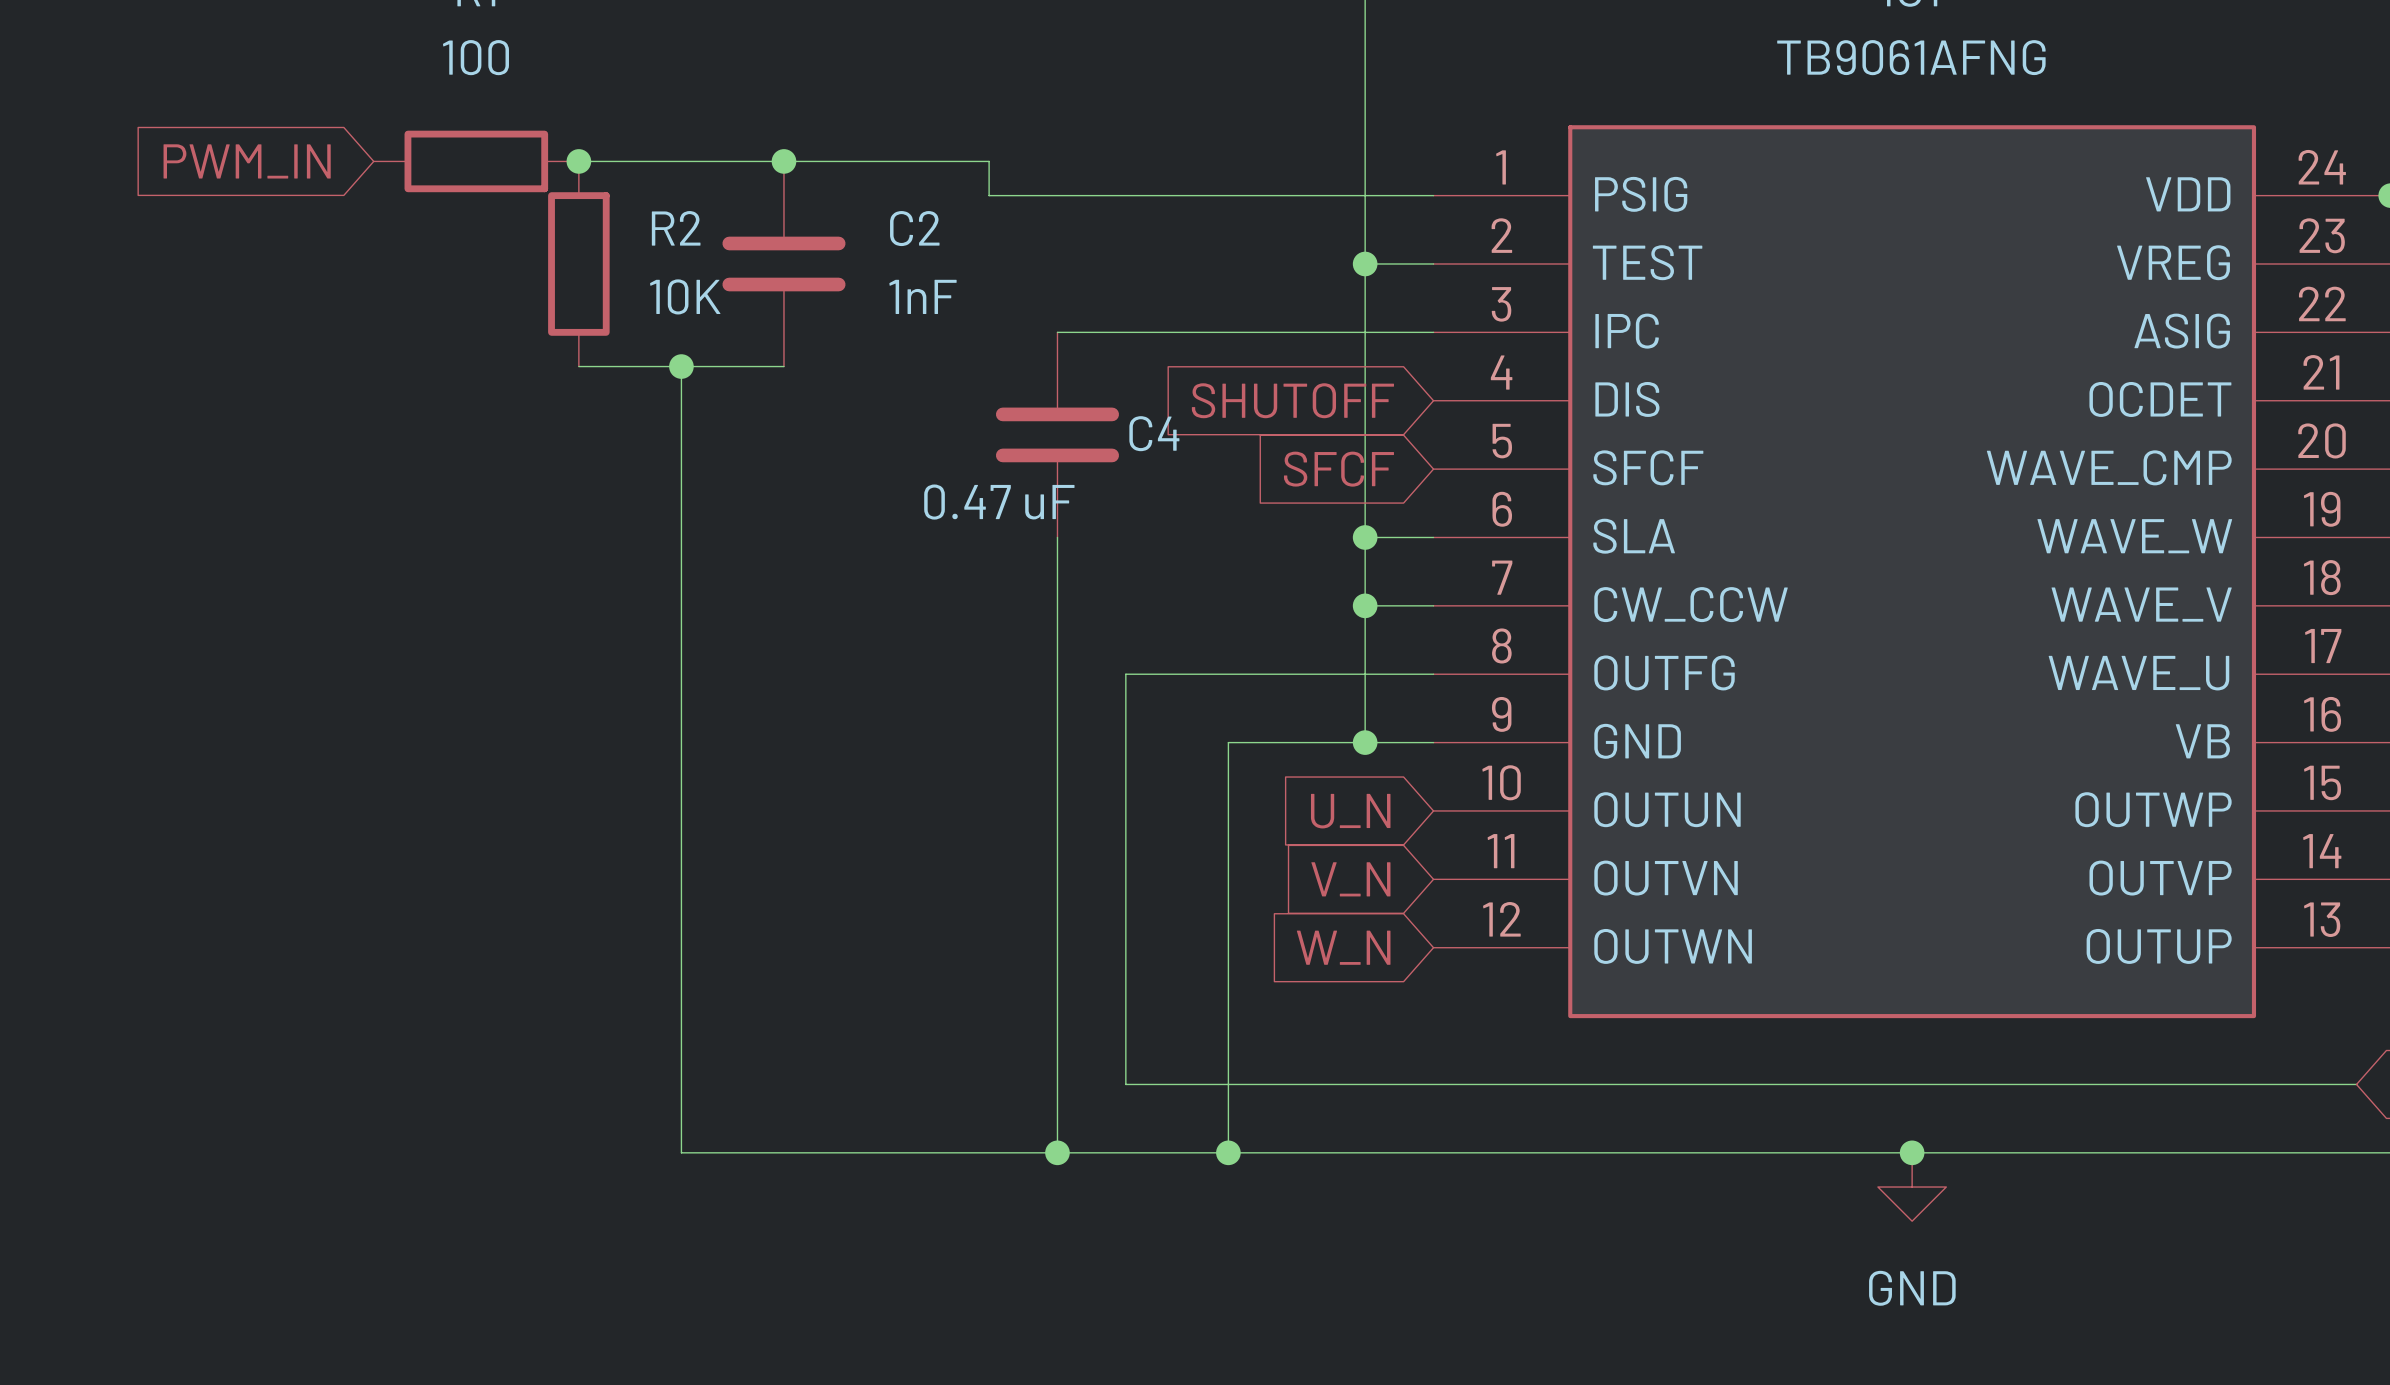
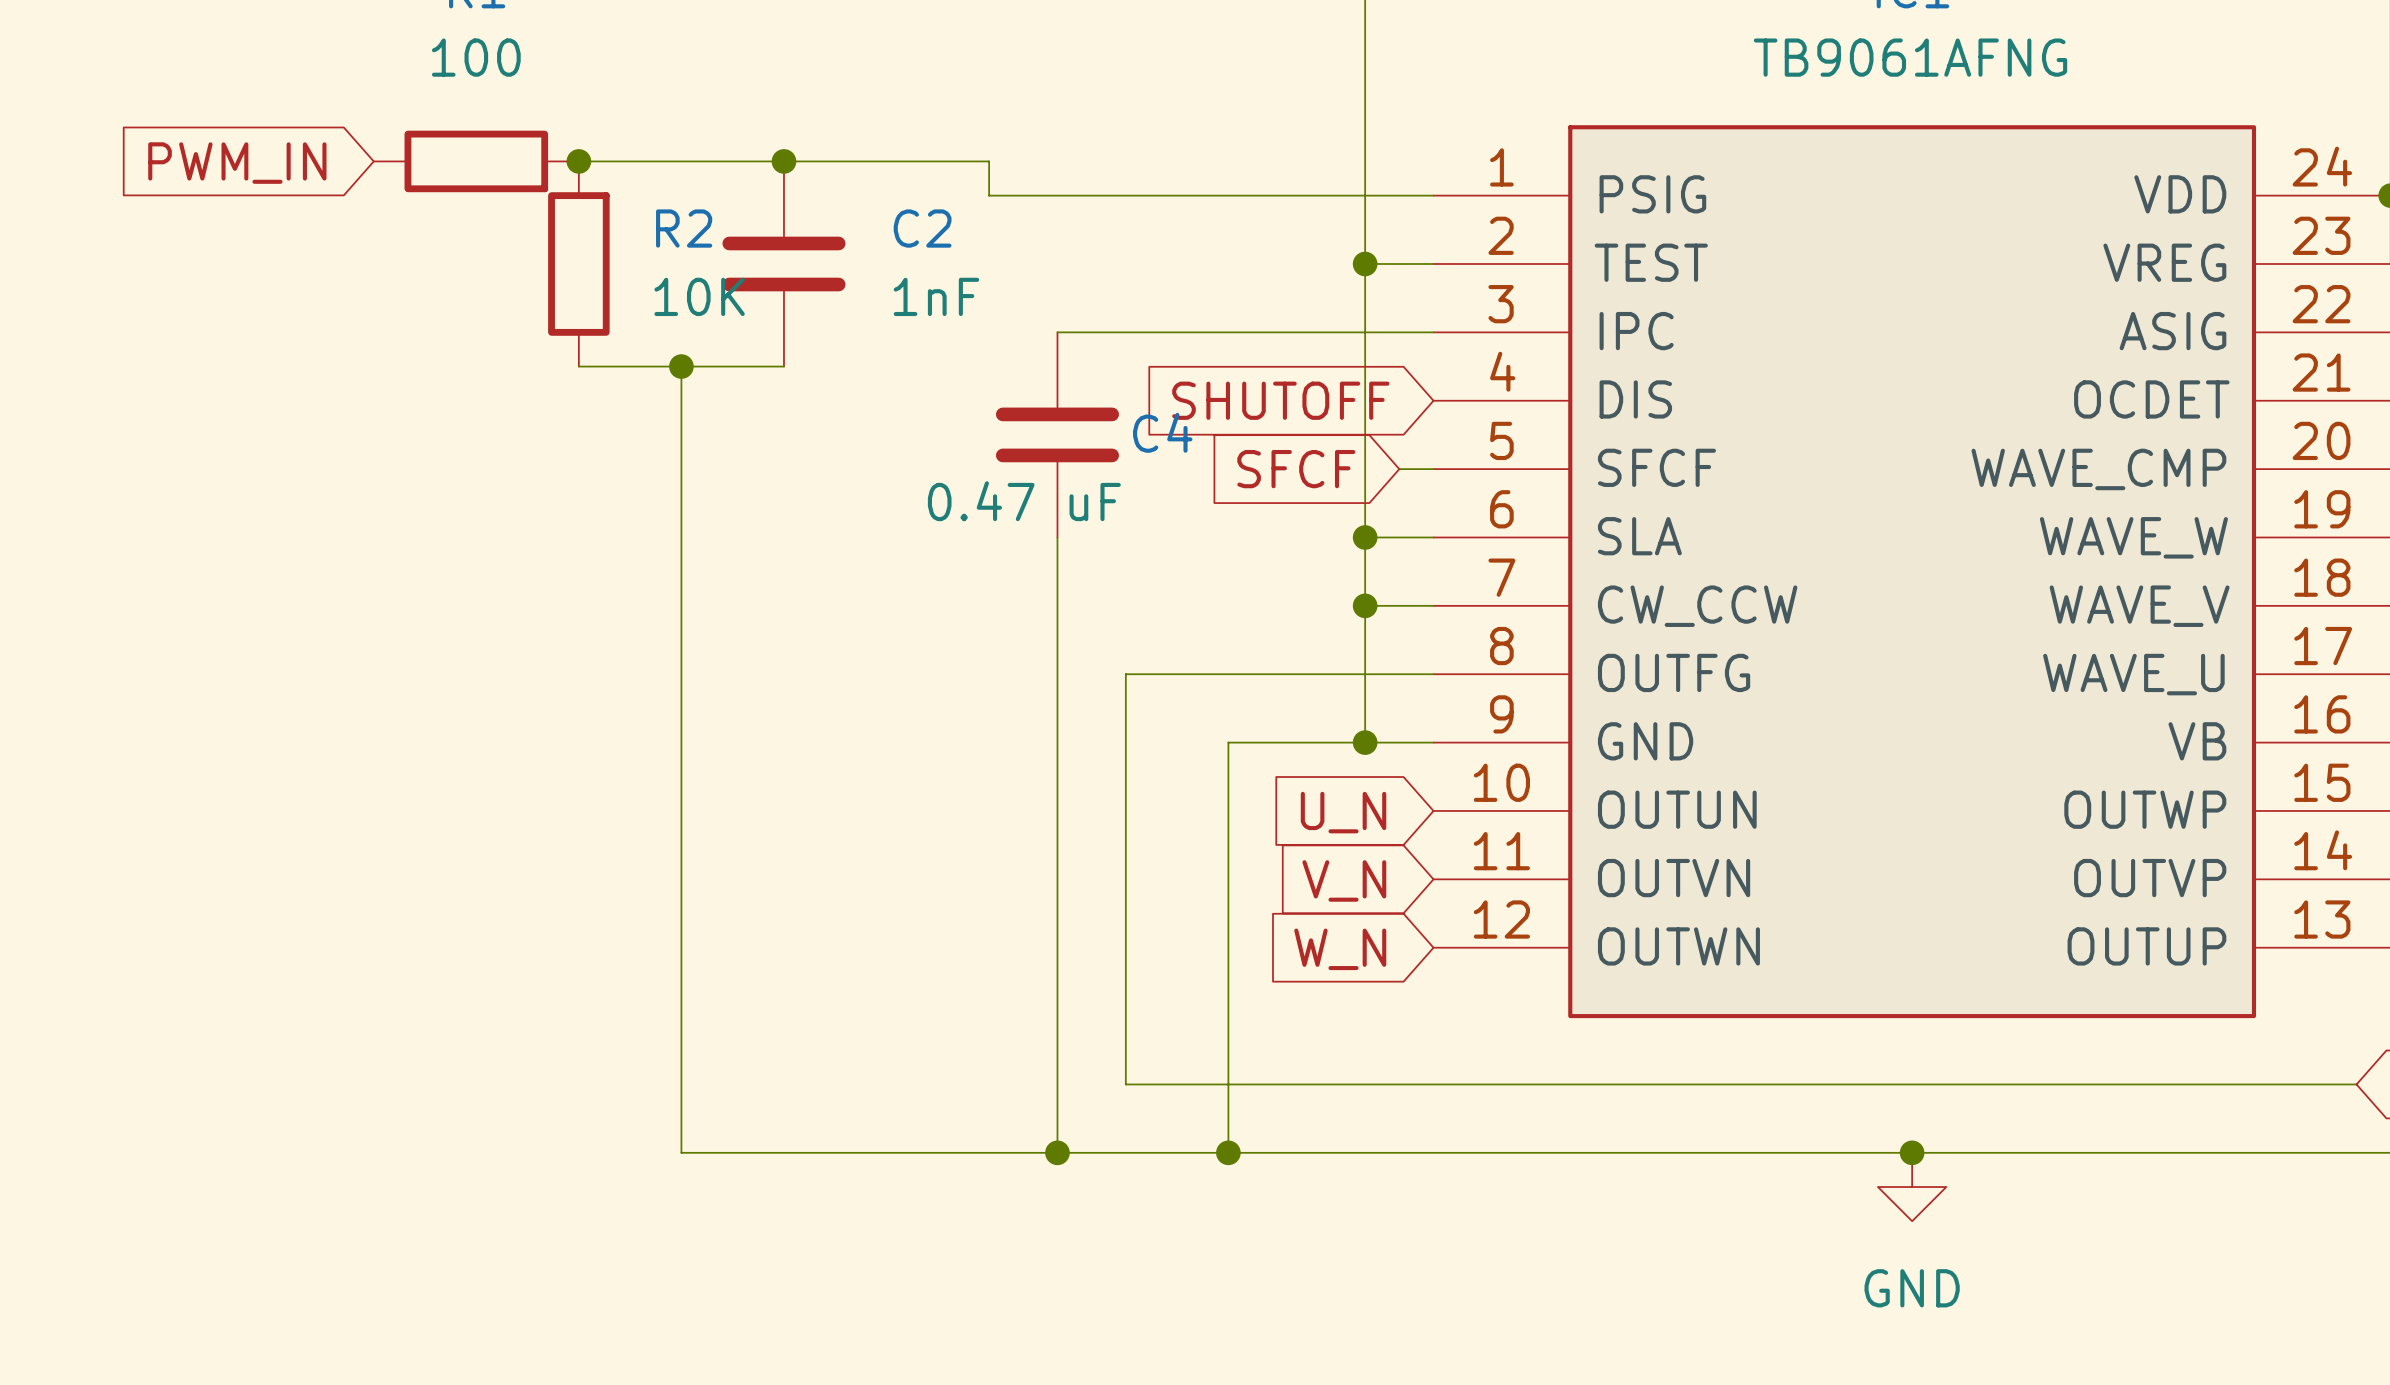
global label position: SFCF (1338, 469) -> SFCF (1296, 469)
wire: none -> (1399, 469) (1433, 469)

